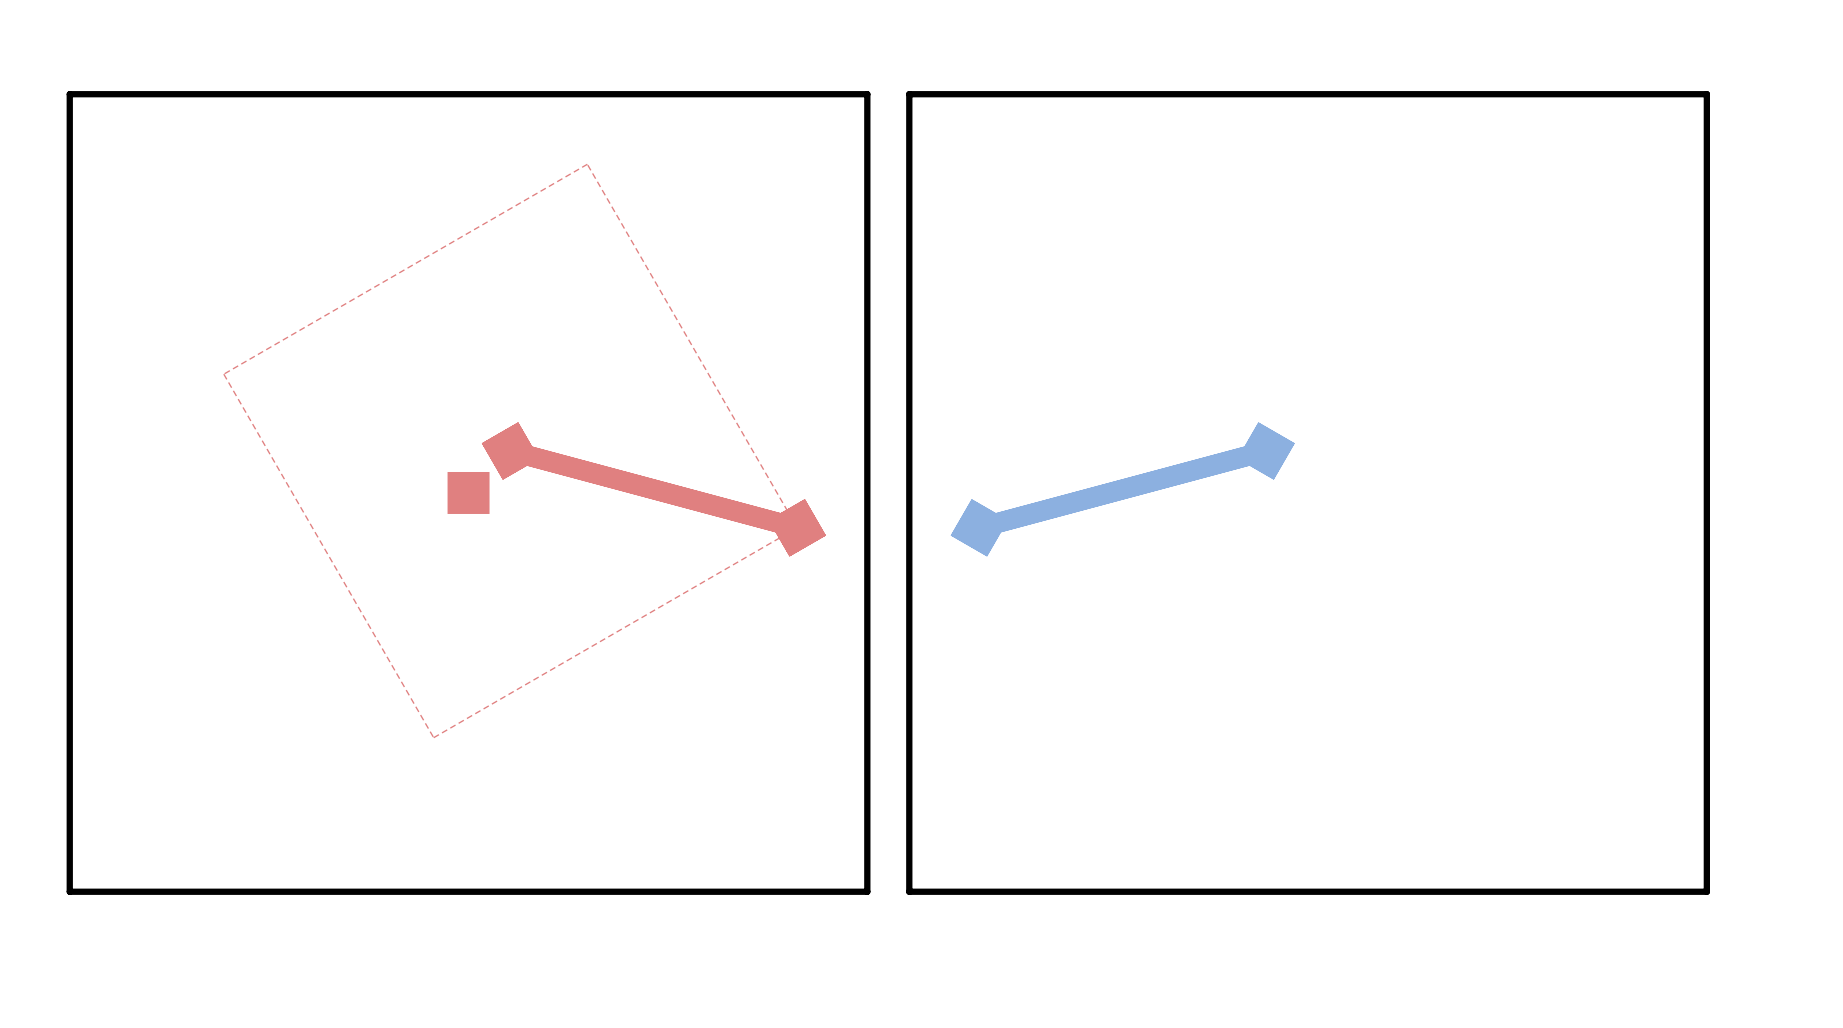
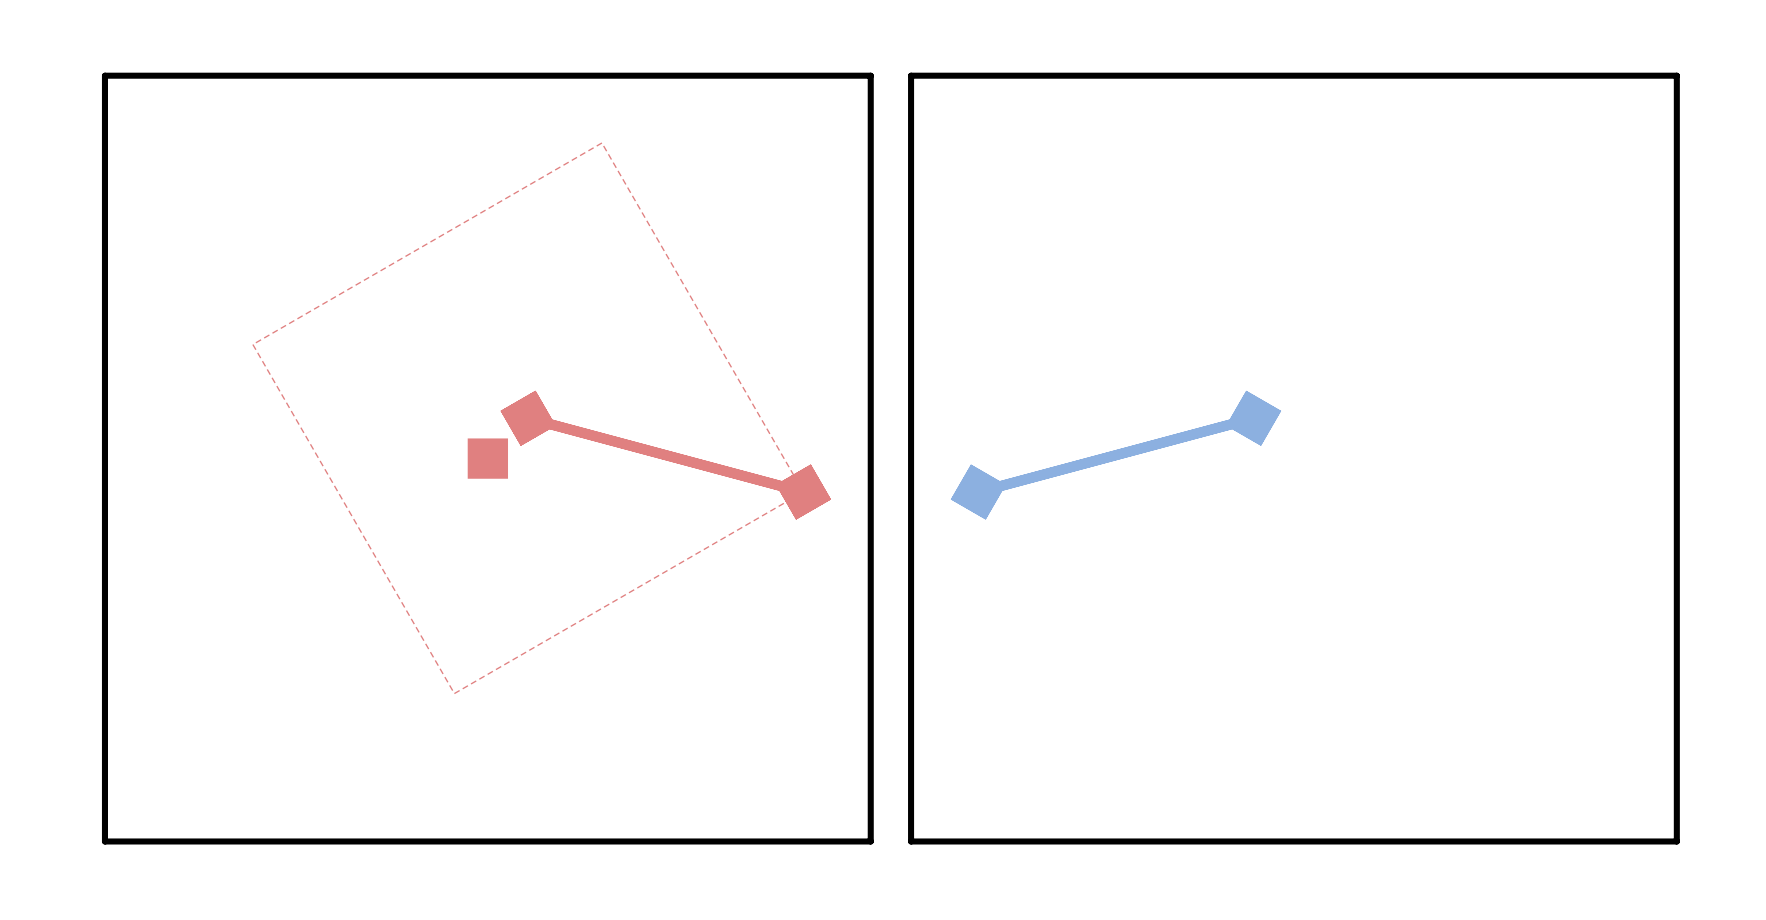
top track width: thick (510, 451) (797, 527) -> thin (528, 418) (803, 492)
bottom track width: thick (1266, 451) (979, 527) -> thin (1253, 418) (978, 492)

